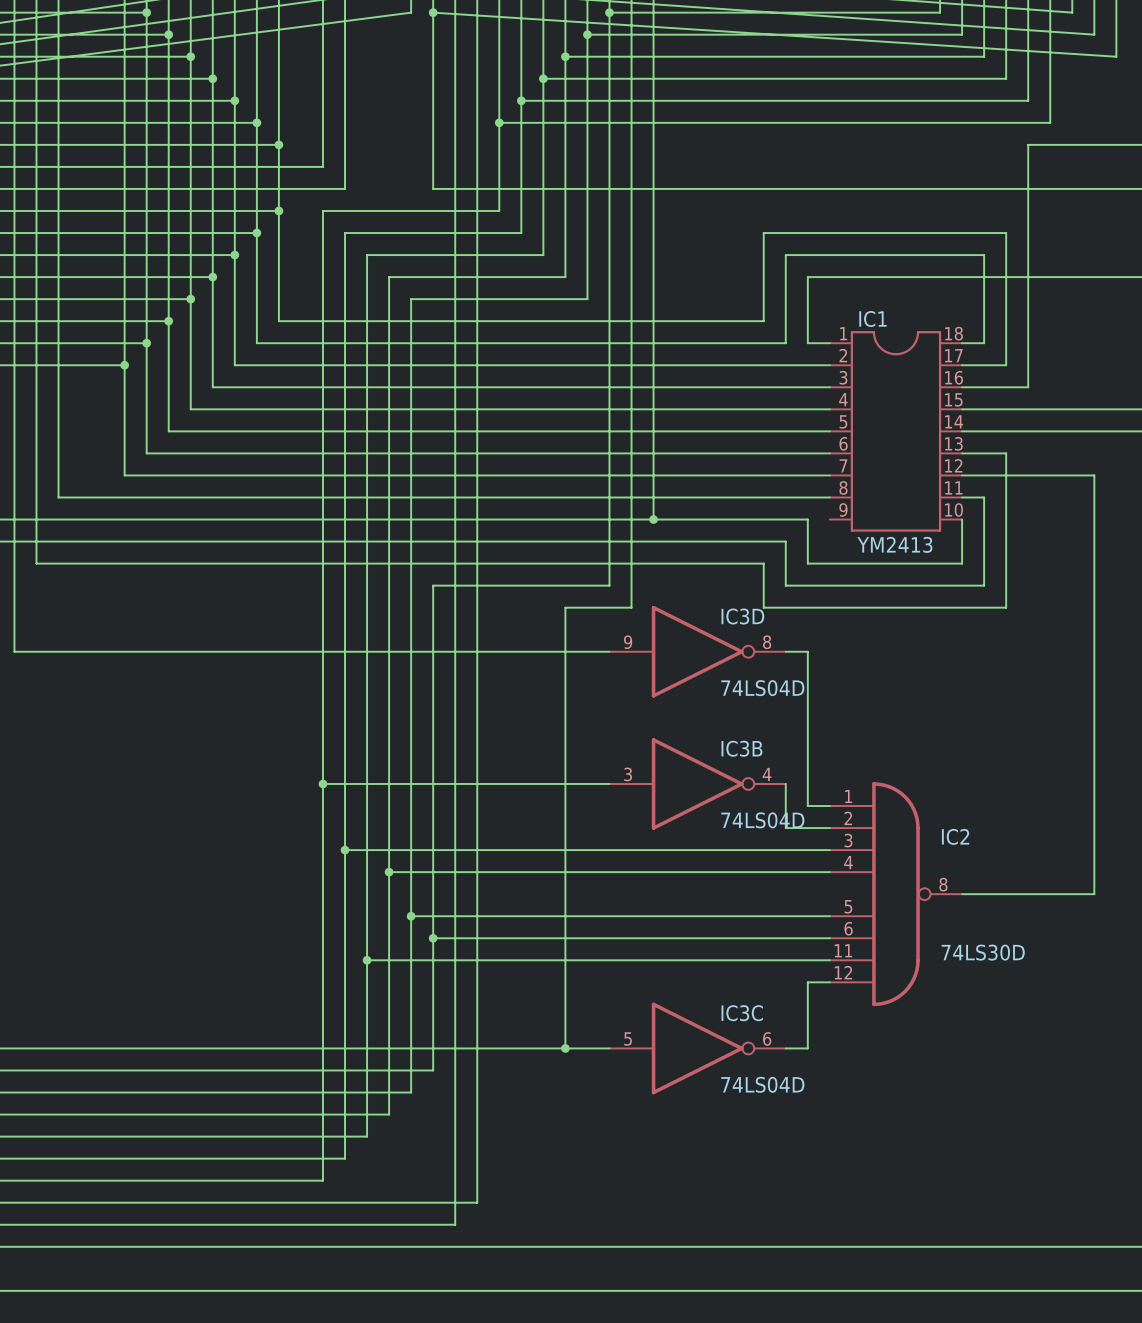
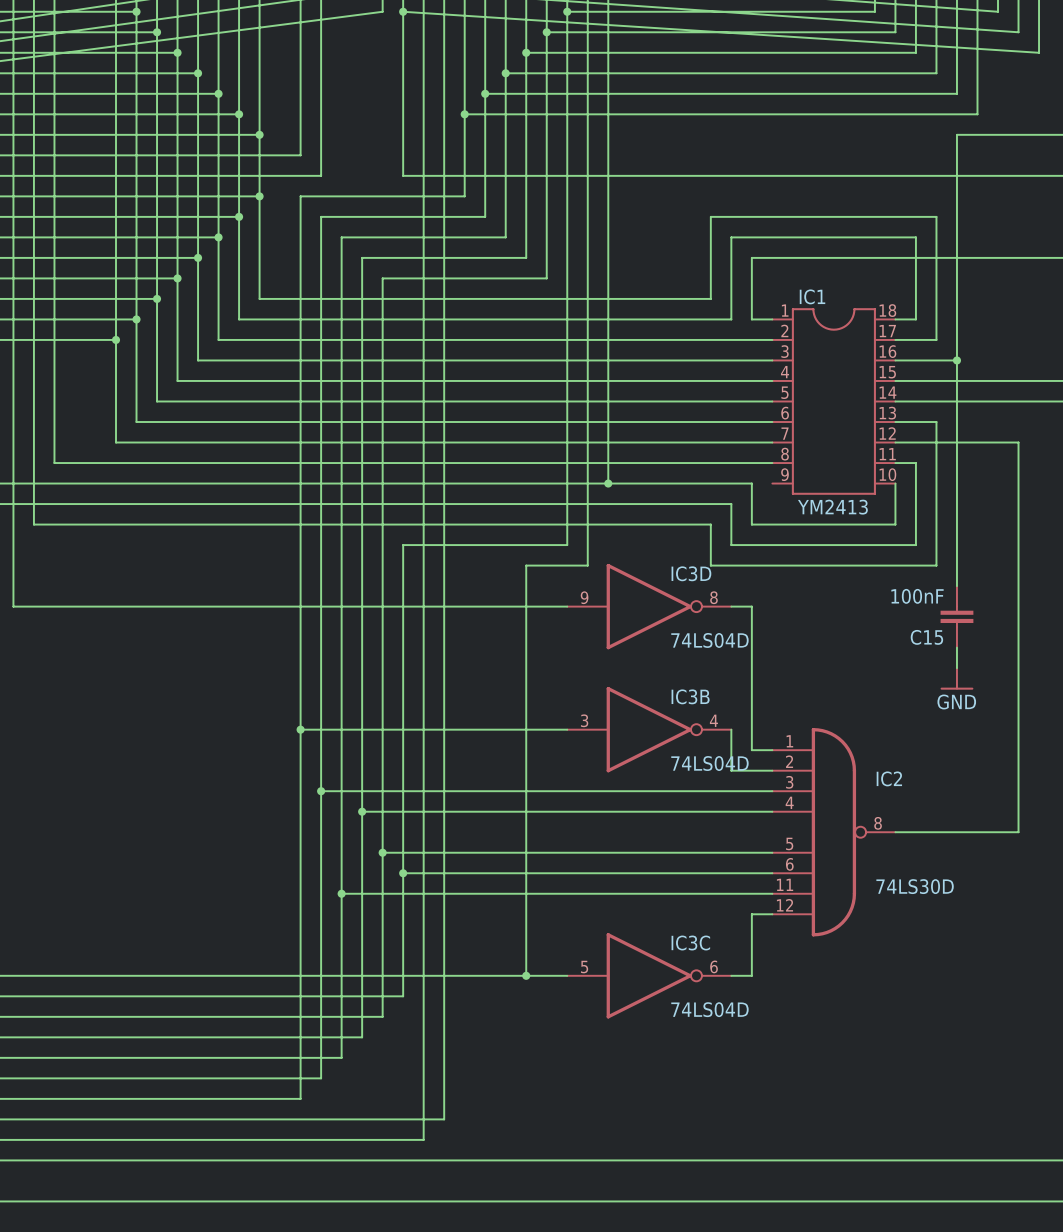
wire: none -> (956, 360) (956, 586)
junction: none -> (956, 360)
C15: none -> 100nF (956, 616)
wire: none -> (956, 647) (956, 668)
power symbol: none -> GND (956, 678)

